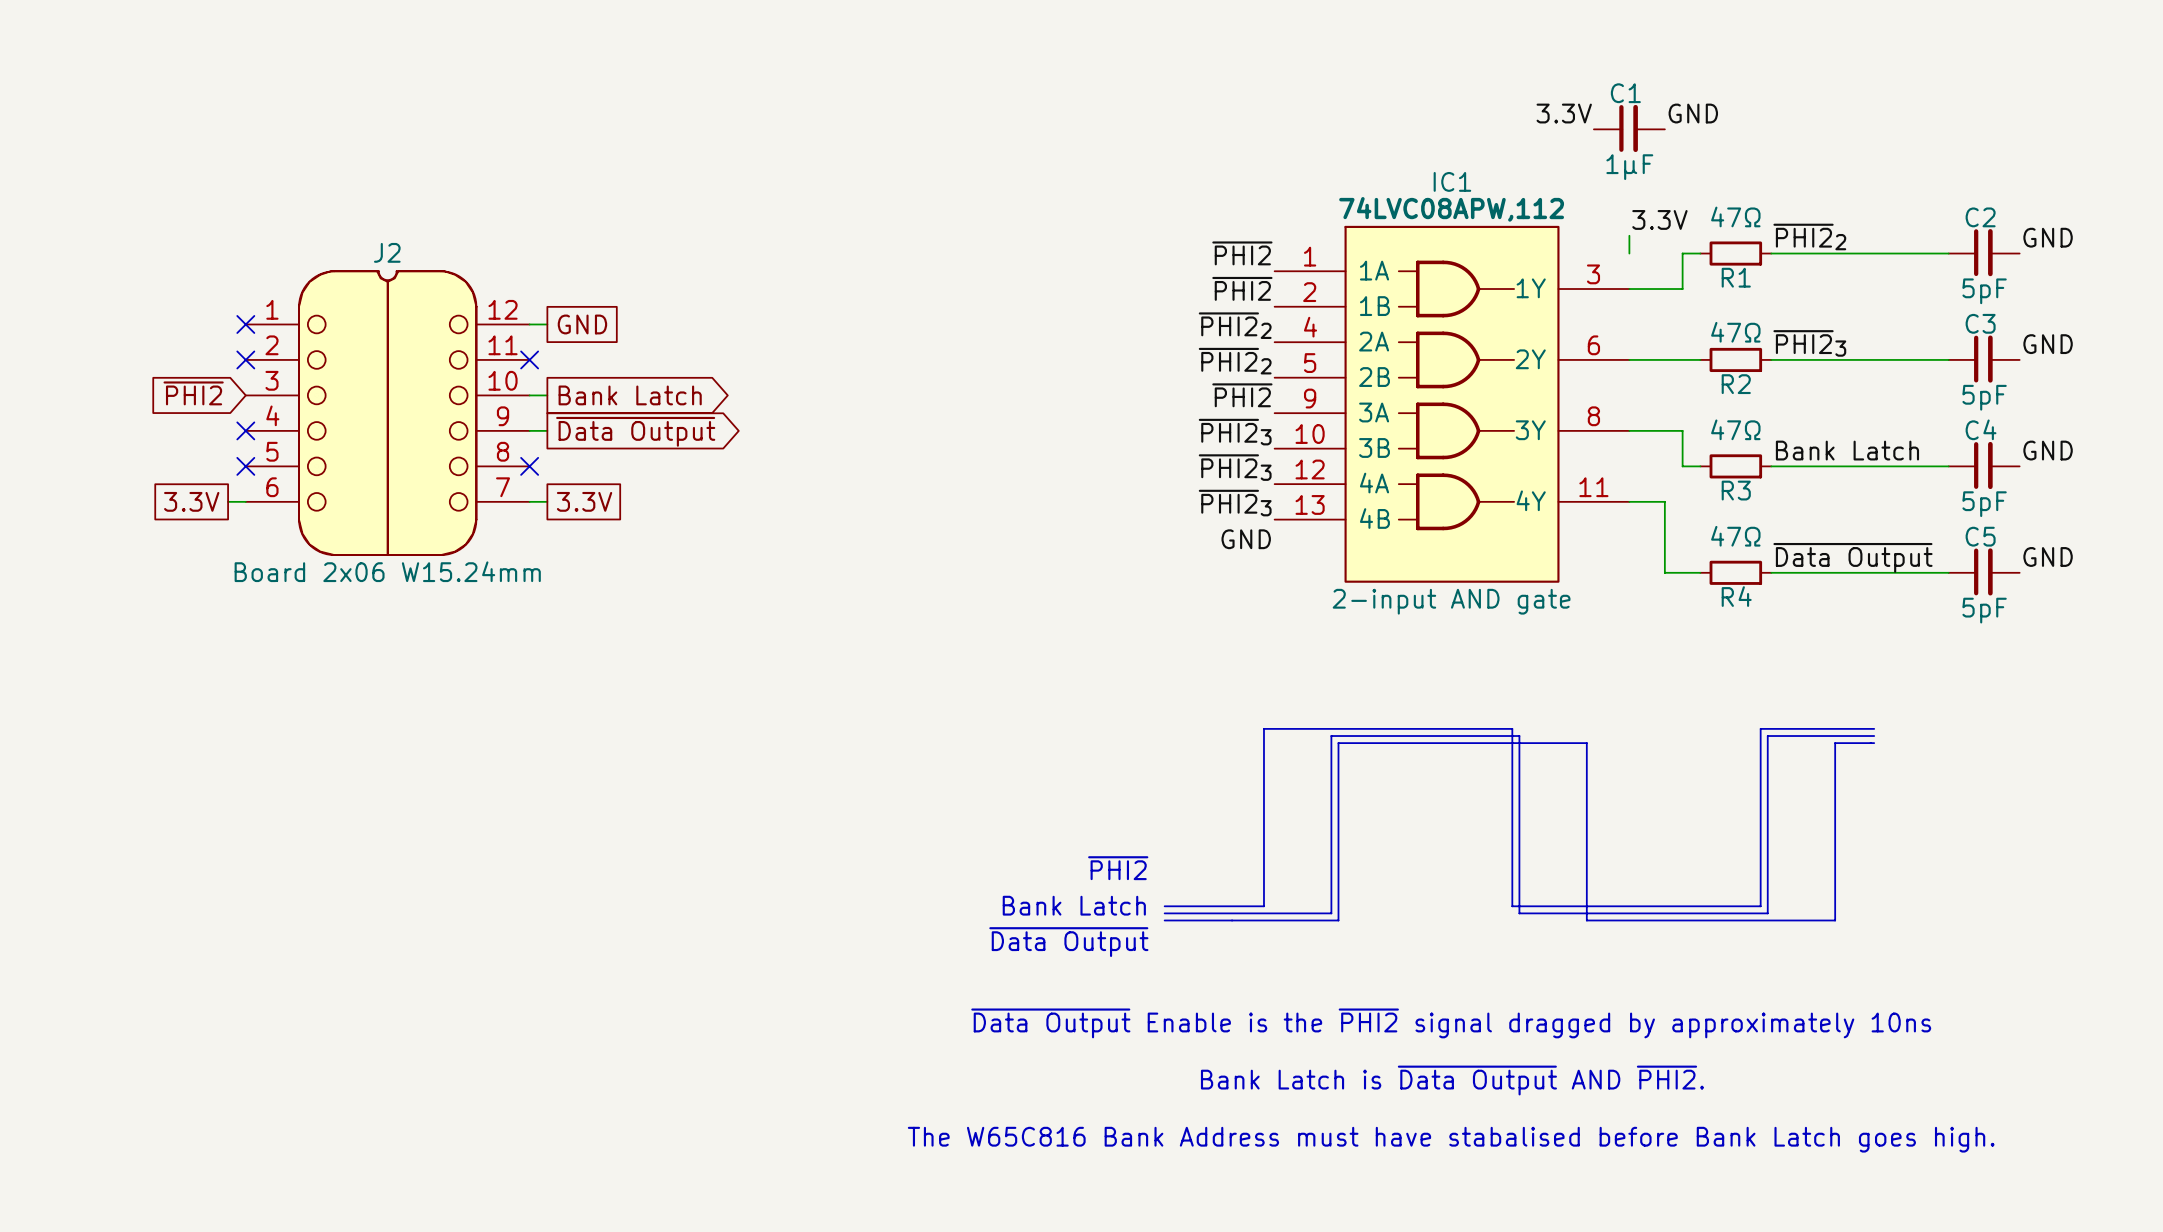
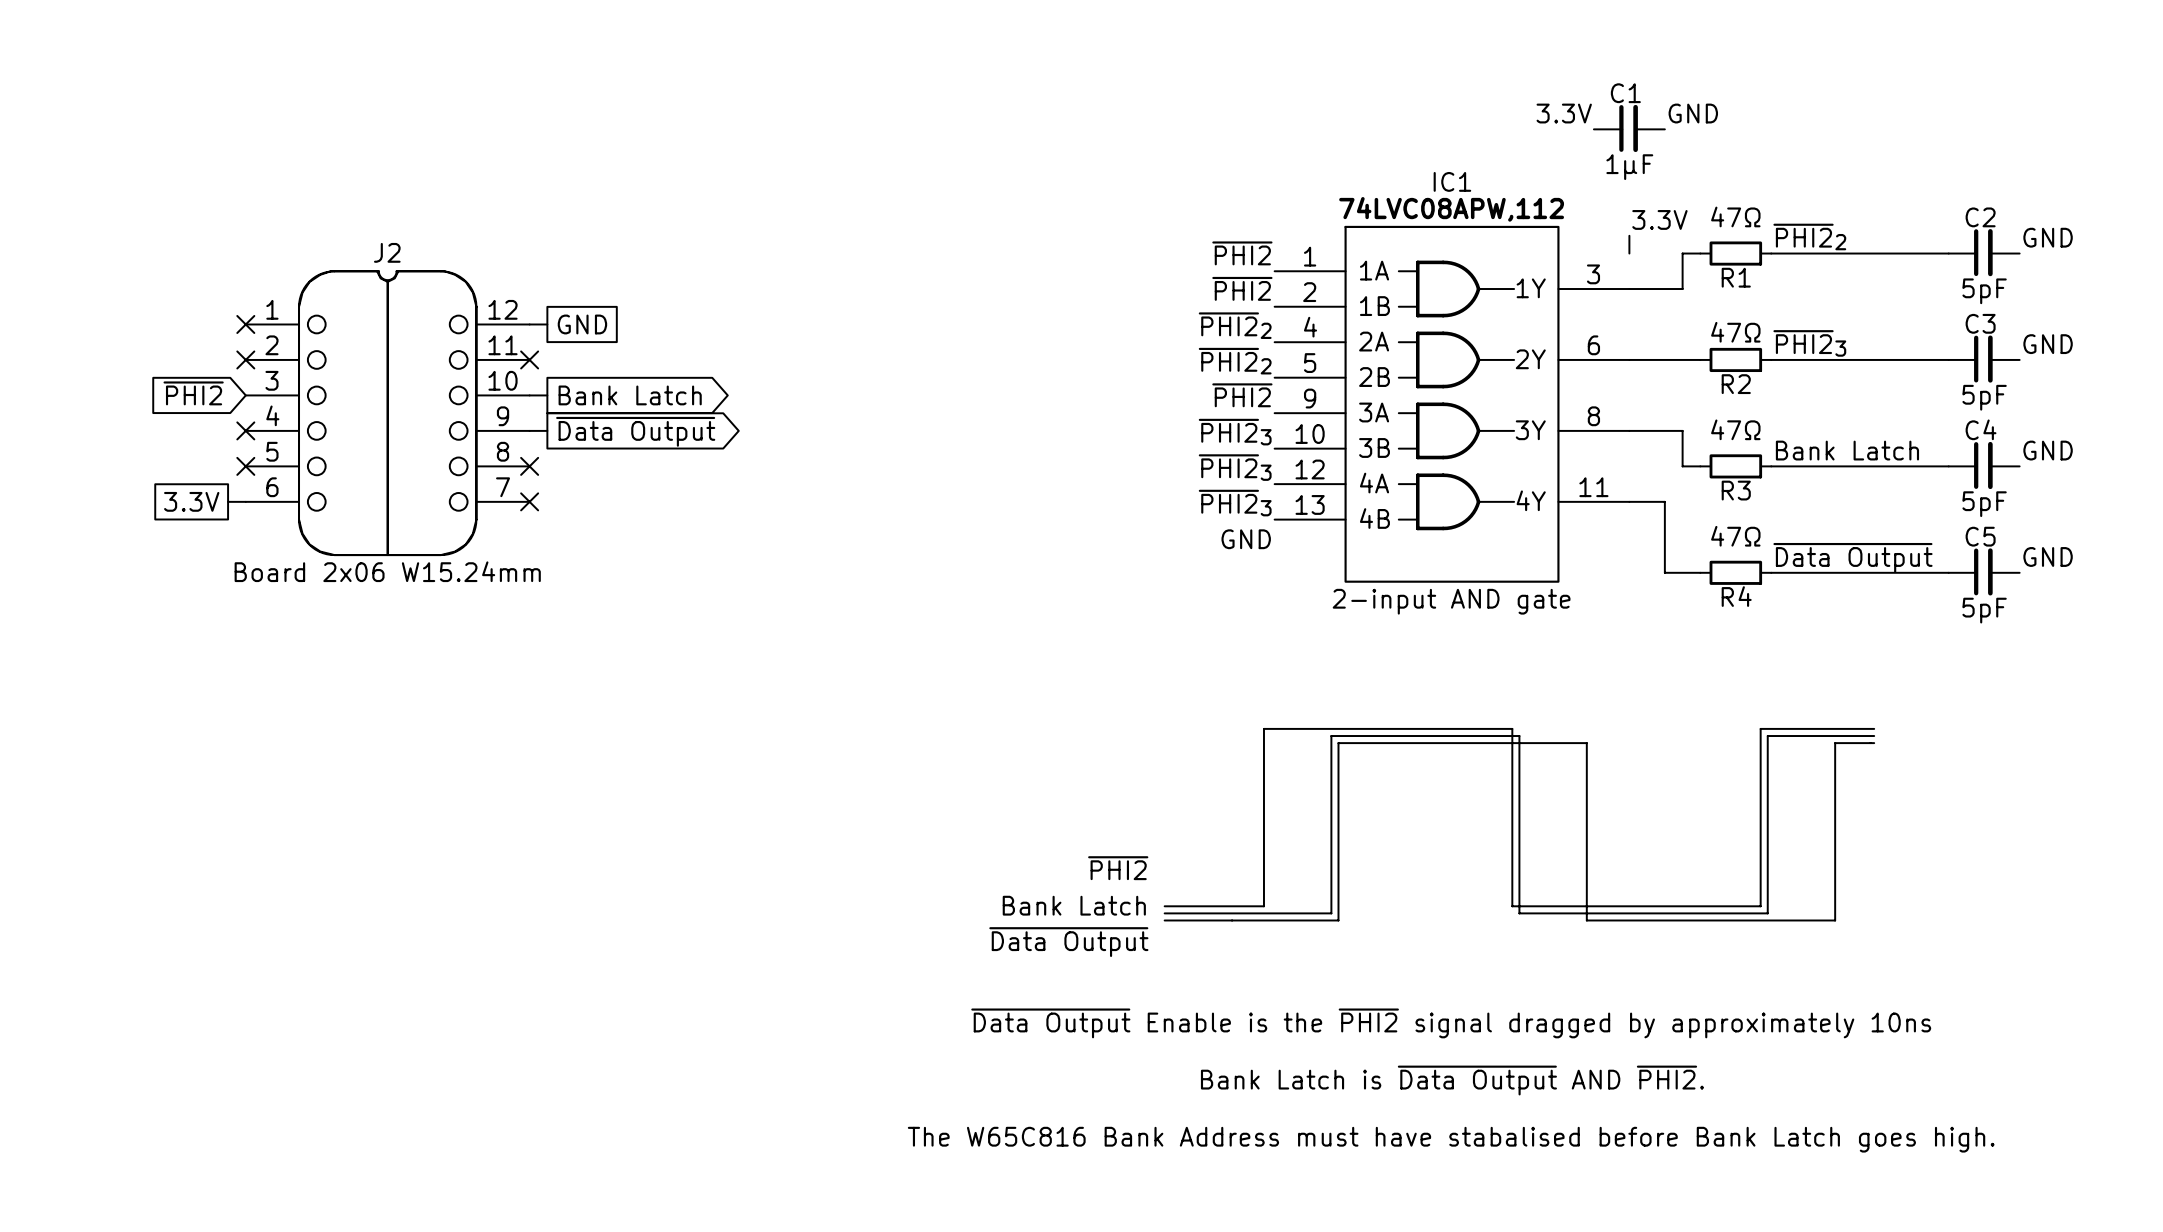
wire: (529, 501) (547, 501) -> none
no-connect mark: none -> (529, 501)
global label: 3.3V (584, 501) -> none

